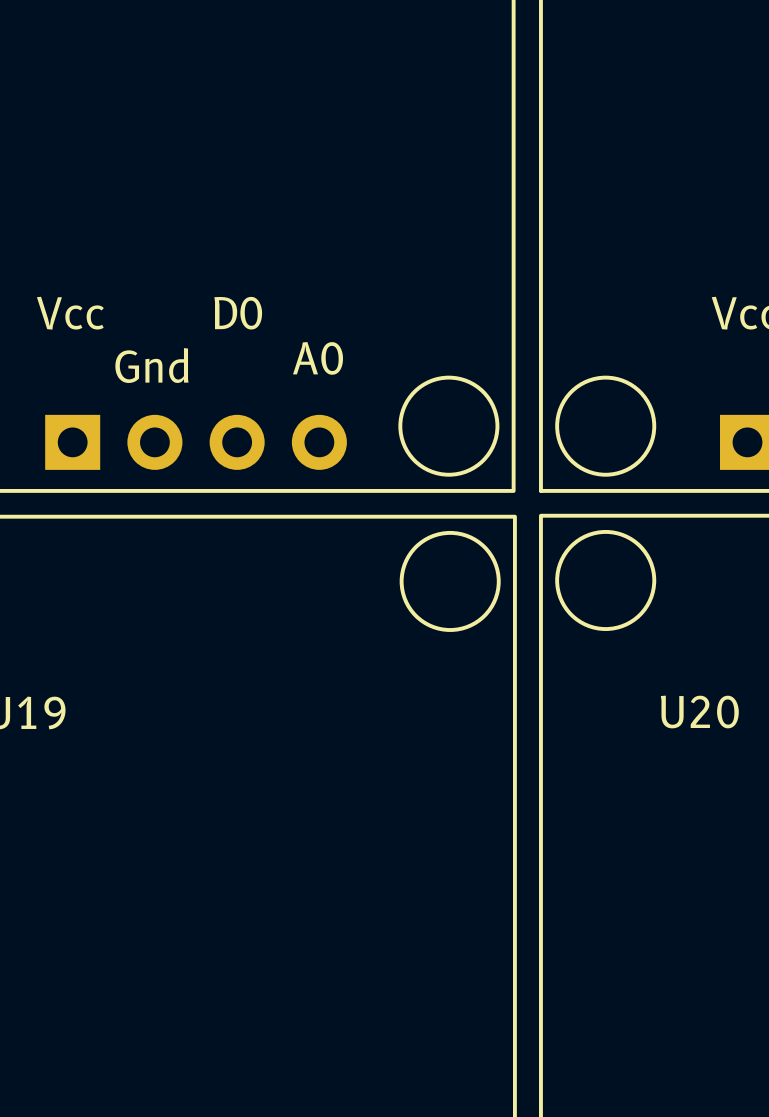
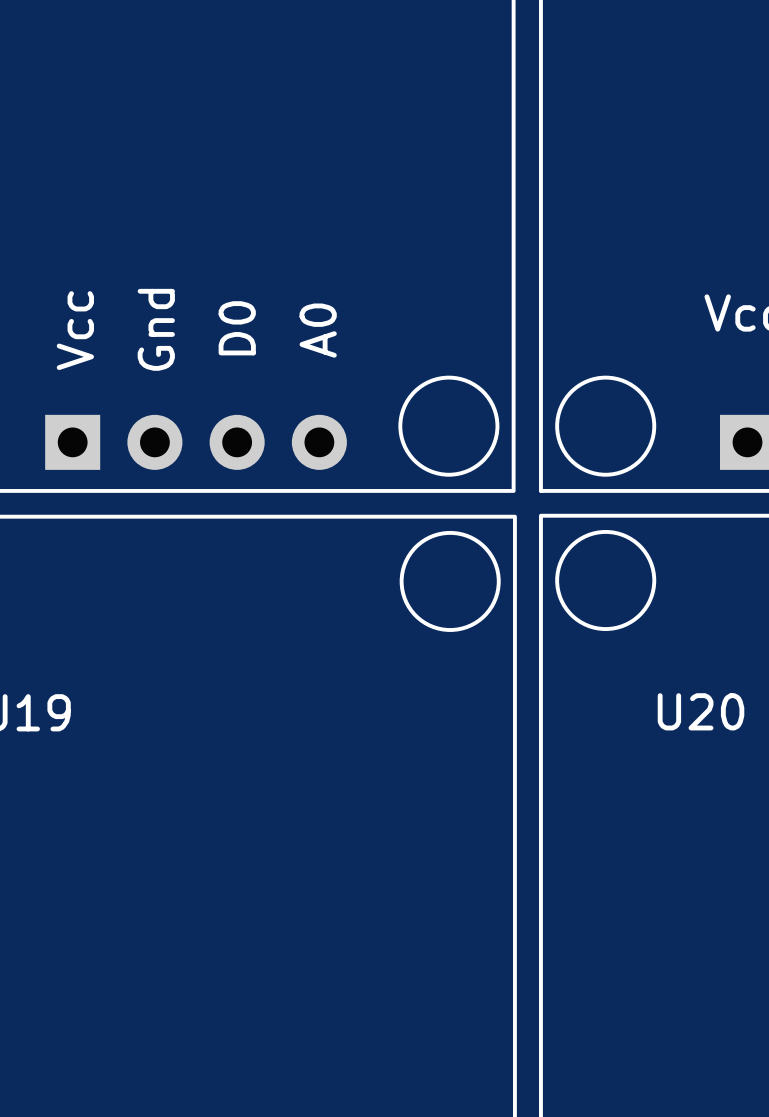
part text rotation: 0° (70, 313) -> 90° counterclockwise (75, 330)
part text rotation: 0° (238, 313) -> 90° counterclockwise (237, 328)
part text rotation: 0° (318, 358) -> 90° counterclockwise (318, 330)
part text rotation: 0° (151, 365) -> 90° counterclockwise (156, 329)

